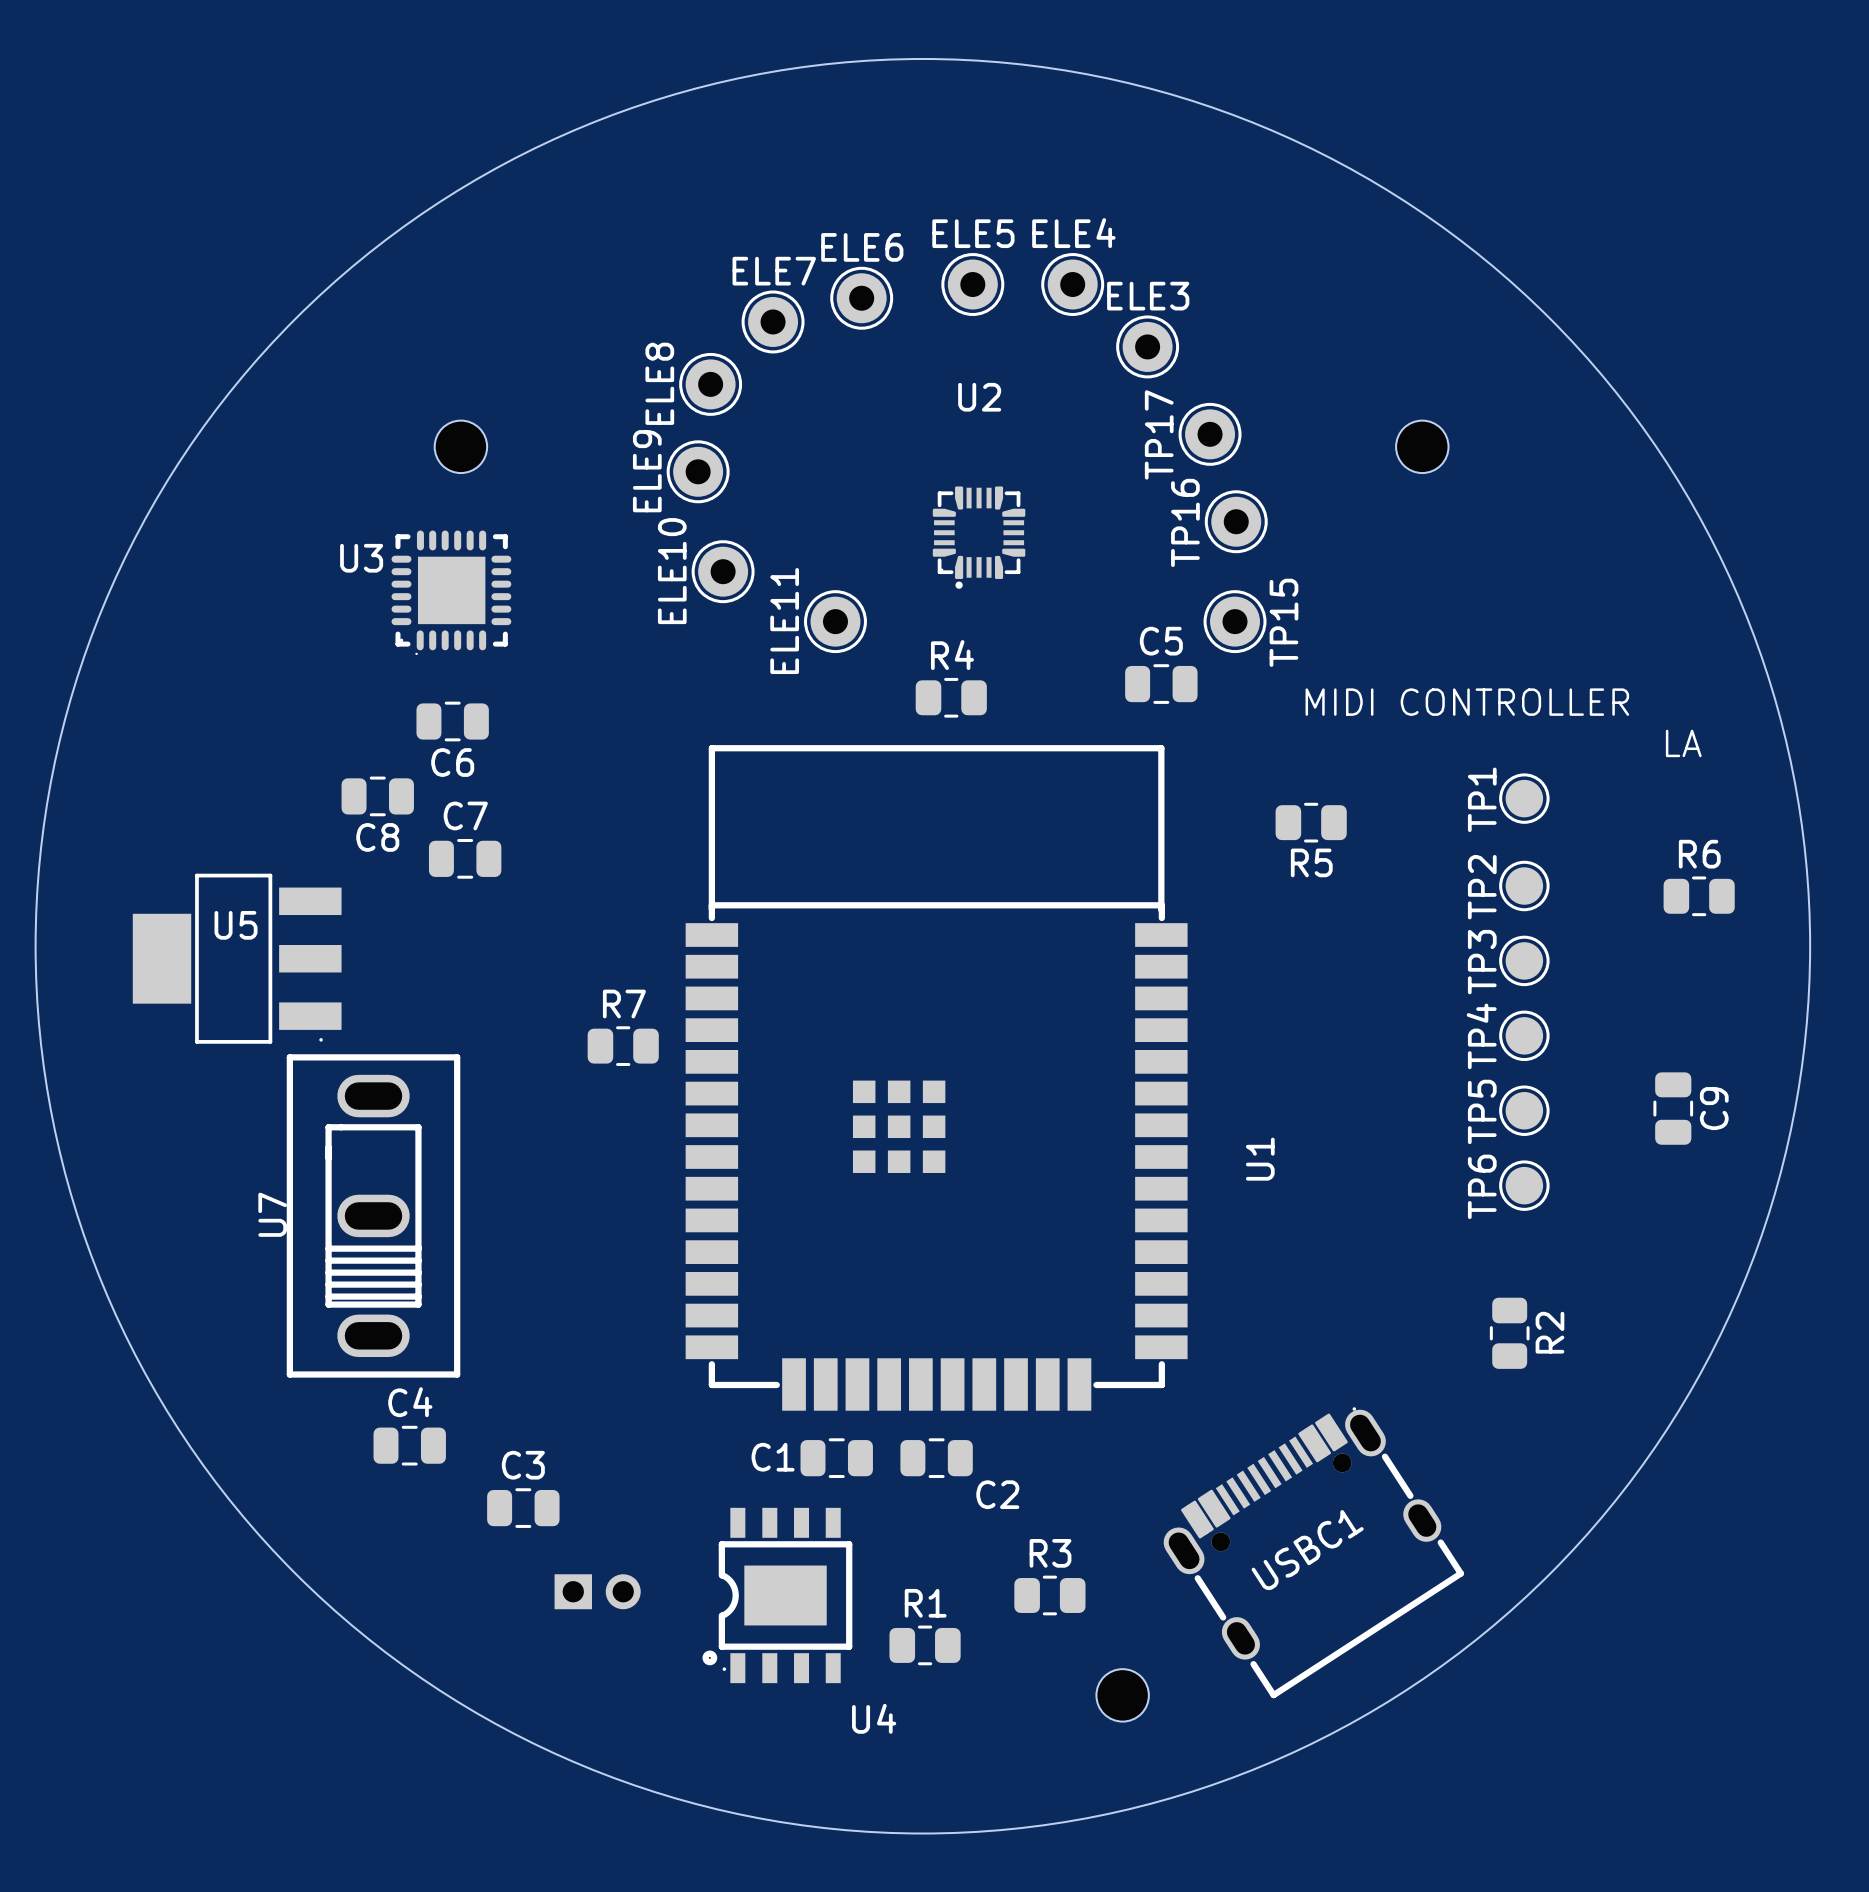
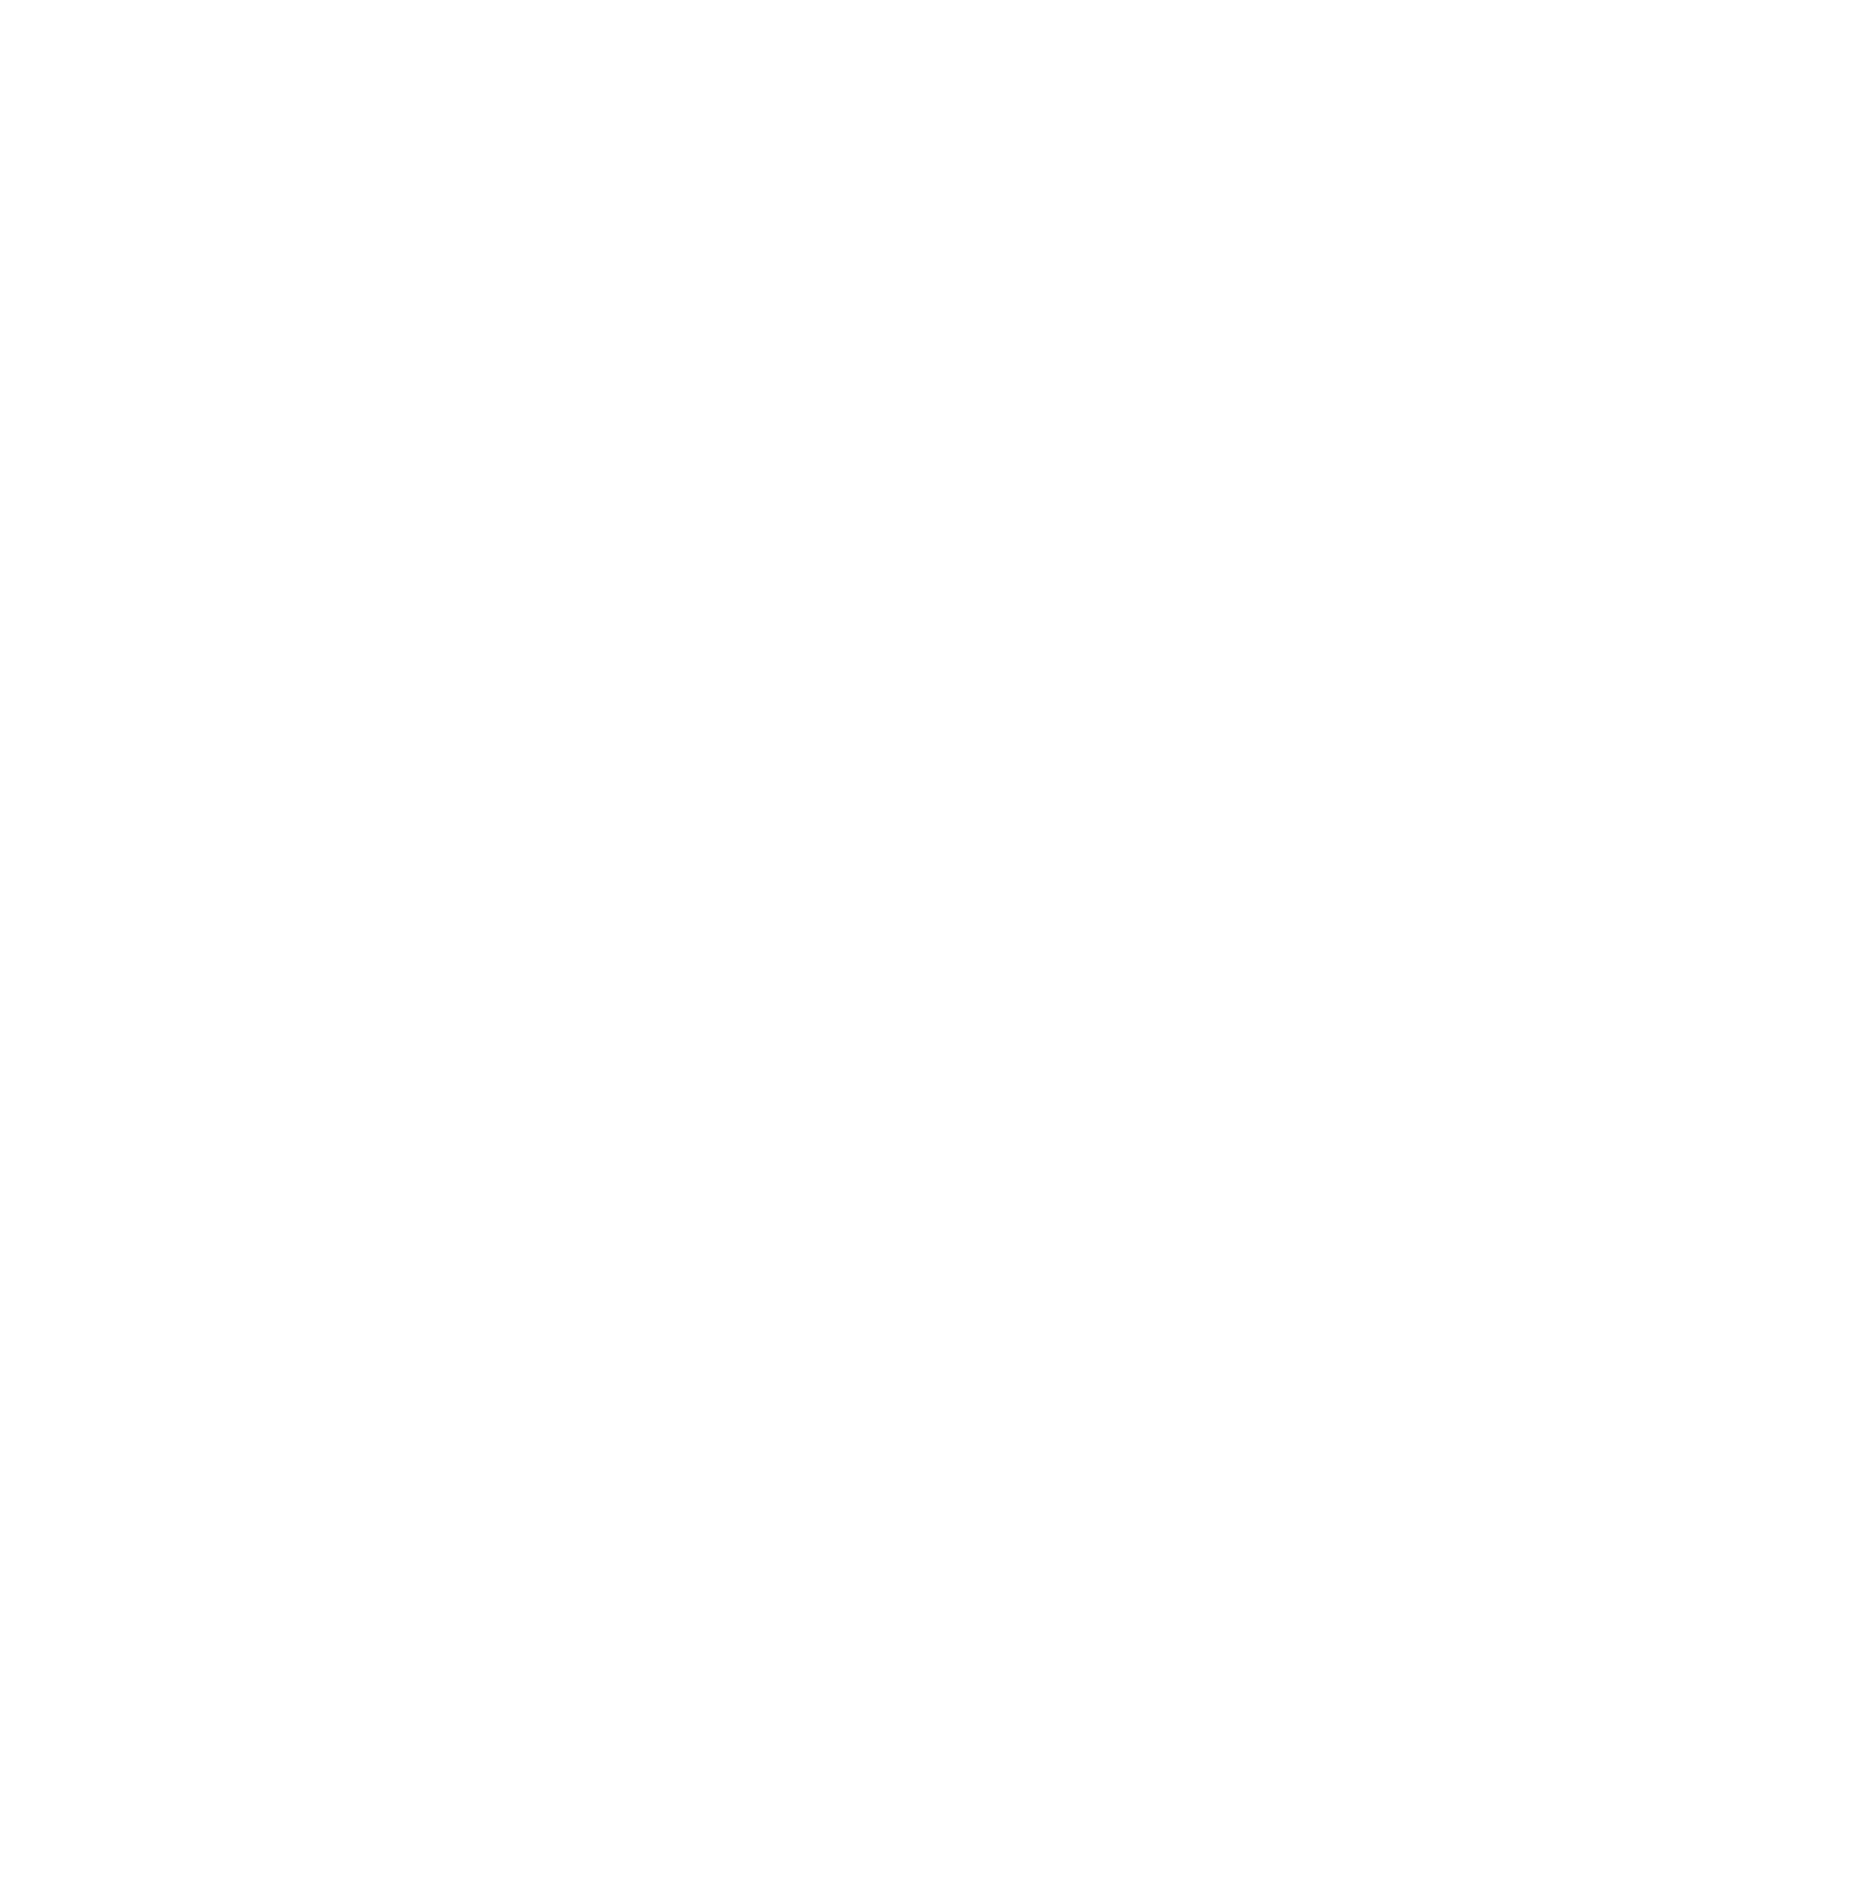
round board edge: [34, 58, 1811, 1835] -> none
ELE5: (972, 284) -> none
ELE4: (1072, 284) -> none
ELE6: (861, 298) -> none
ELE7: (773, 321) -> none
ELE3: (1147, 346) -> none
ELE8: (710, 384) -> none
TP17: (1210, 434) -> none
part: (460, 446) -> none
part: (1422, 446) -> none
ELE9: (698, 471) -> none
TP16: (1236, 521) -> none
U2: (979, 537) -> none
ELE10: (723, 571) -> none
U3: (451, 592) -> none
ELE11: (835, 621) -> none
TP15: (1235, 621) -> none
C5: (1161, 684) -> none
R4: (951, 697) -> none
text: MIDI CONTROLLER (1467, 702) -> none
C6: (452, 721) -> none
text: LA (1683, 743) -> none
C8: (377, 796) -> none
TP1: (1524, 798) -> none
R5: (1311, 822) -> none
C7: (465, 858) -> none
TP2: (1524, 886) -> none
R6: (1699, 896) -> none
U5: (237, 958) -> none
TP3: (1524, 960) -> none
TP4: (1524, 1035) -> none
R7: (623, 1046) -> none
U1: (936, 1077) -> none
C9: (1673, 1108) -> none
TP5: (1524, 1110) -> none
TP6: (1524, 1185) -> none
U7: (373, 1215) -> none
R2: (1509, 1333) -> none
C4: (409, 1445) -> none
C1: (836, 1458) -> none
C2: (936, 1458) -> none
C3: (523, 1508) -> none
USBC1: (1313, 1552) -> none
part: (597, 1591) -> none
U4: (777, 1595) -> none
R3: (1049, 1595) -> none
R1: (925, 1645) -> none
part: (1122, 1695) -> none

